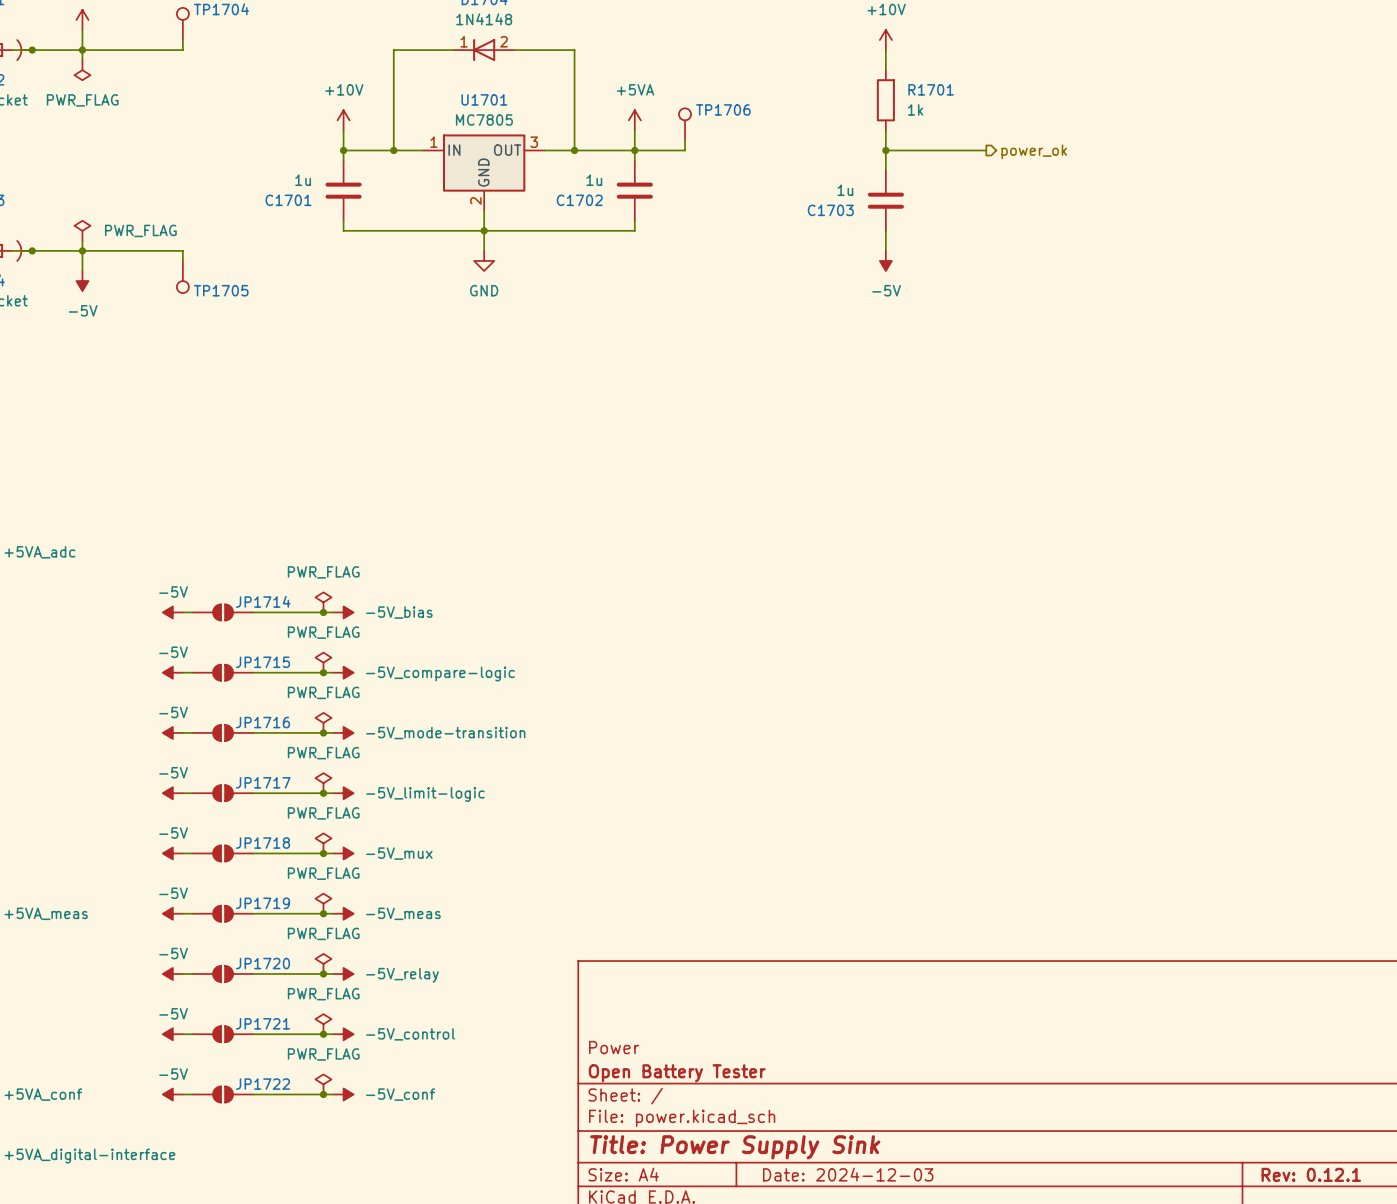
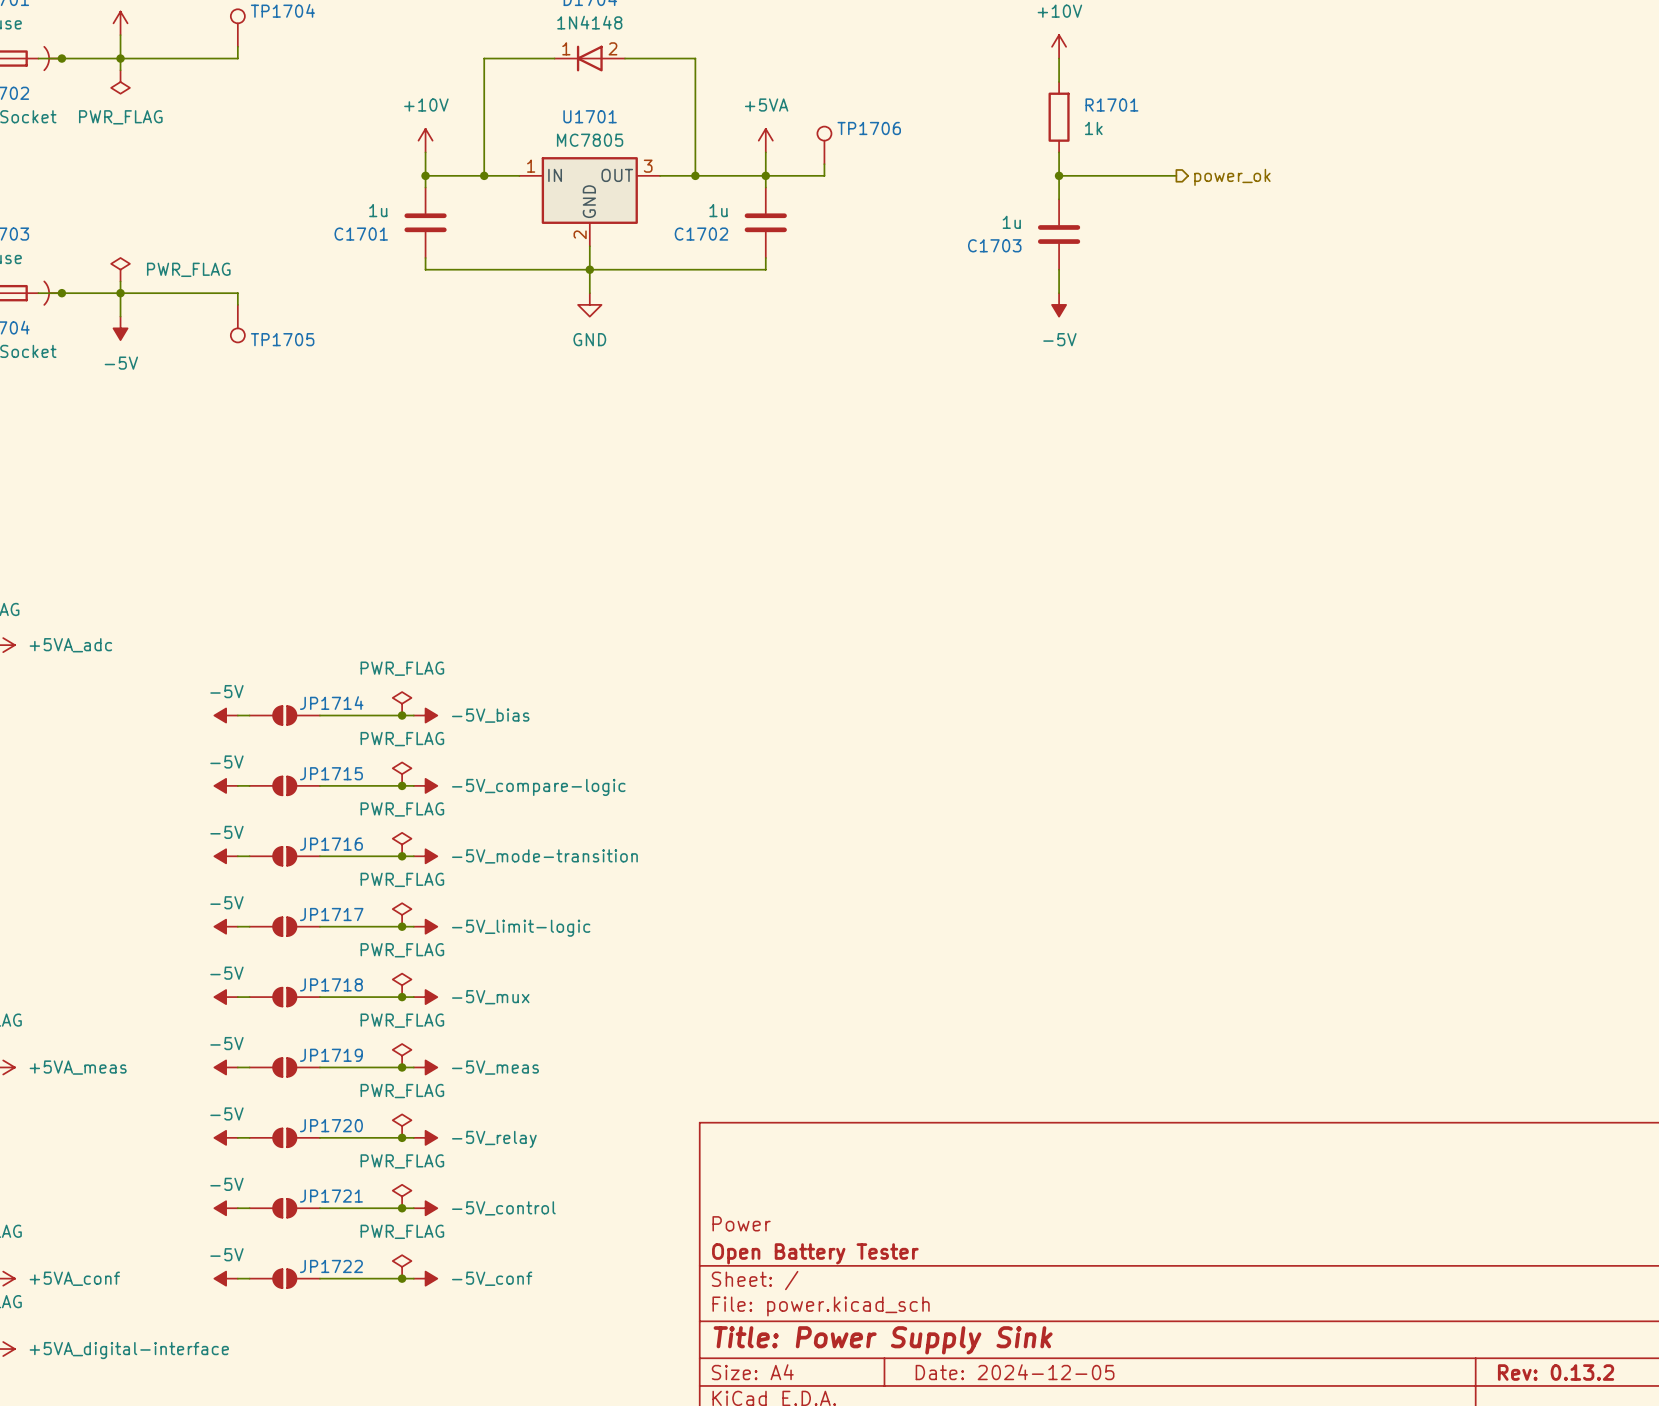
title block: Date: 2024-12-03 (848, 1174) -> Date: 2024-12-05 (1015, 1372)
title block: Rev: 0.12.1 (1311, 1174) -> Rev: 0.13.2 (1556, 1372)

